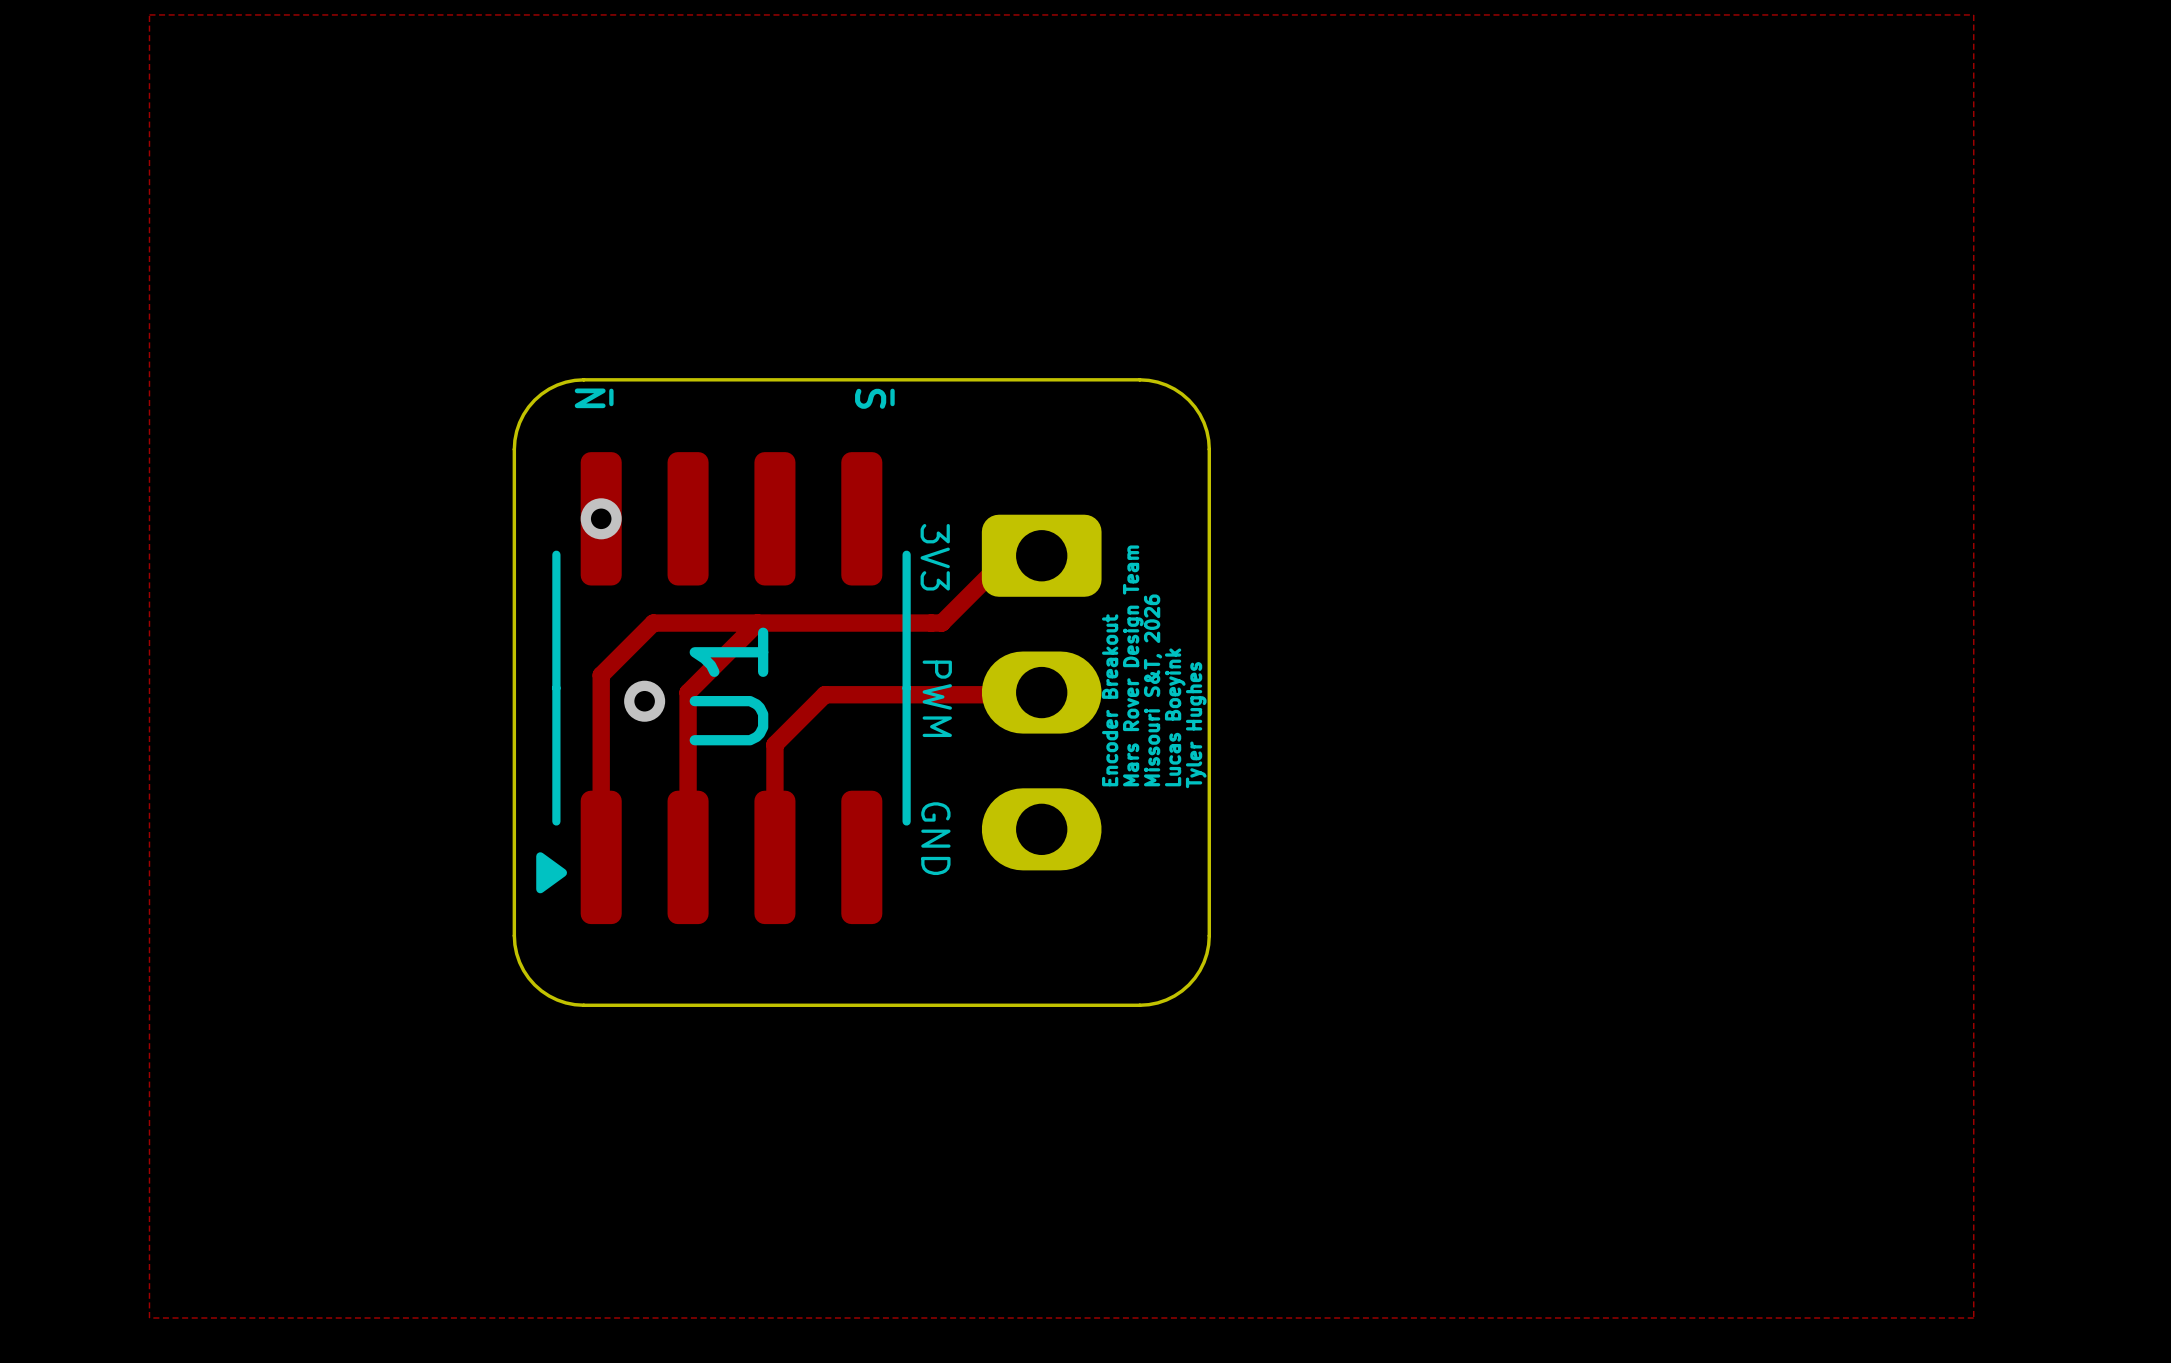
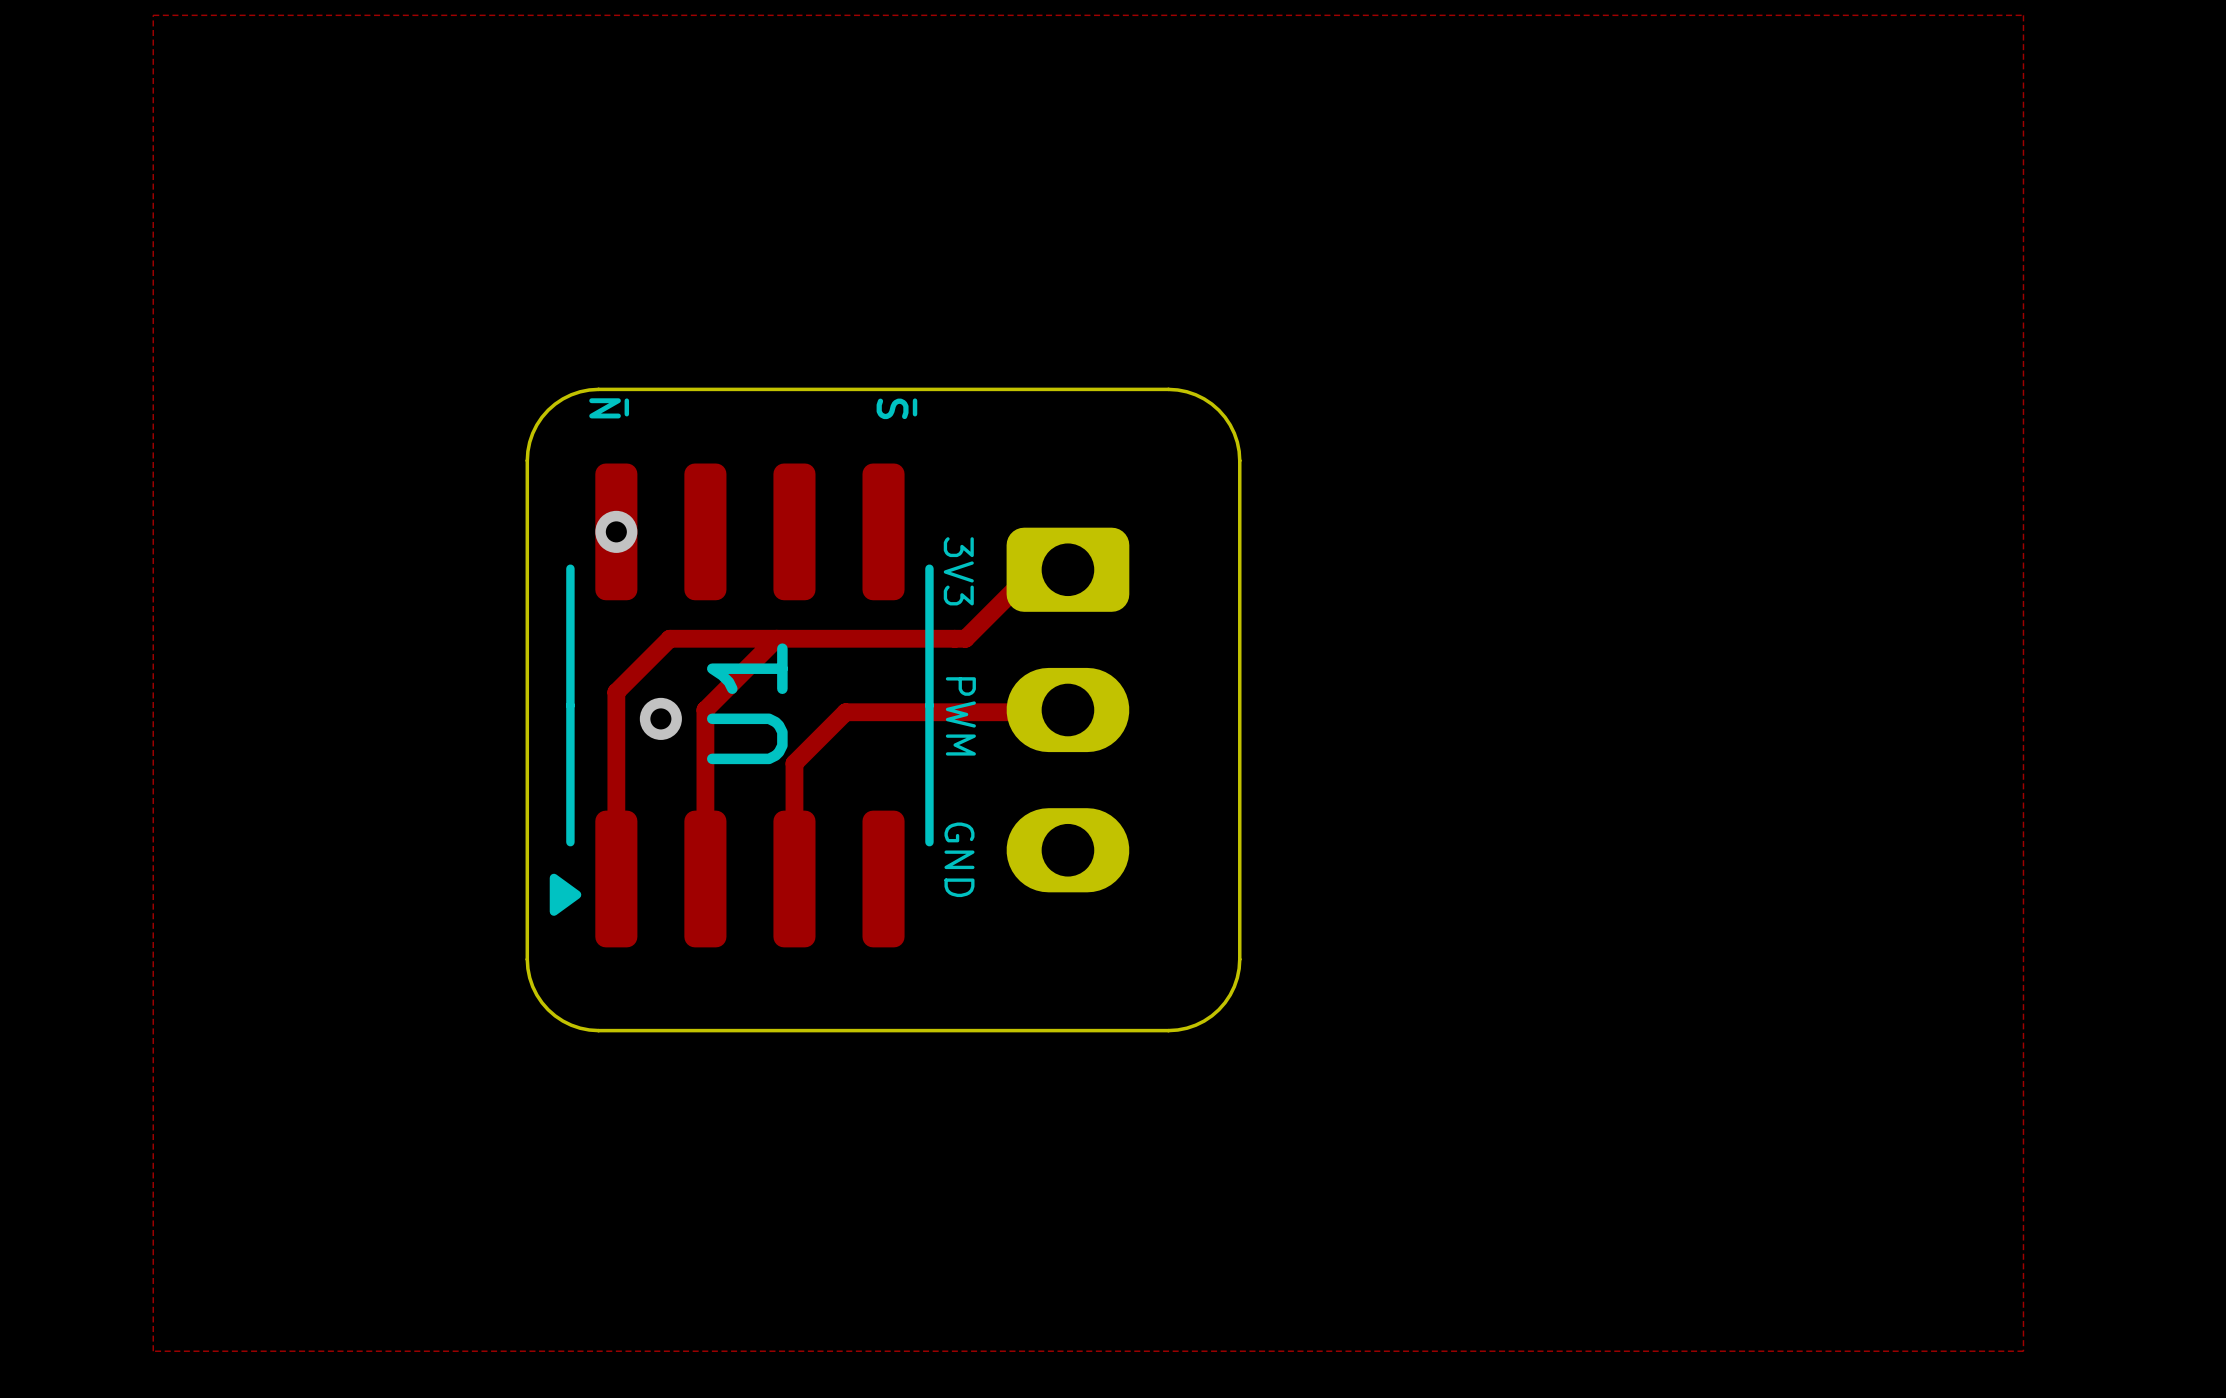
text: Mars Rover Design Team (1133, 665) -> none
text: Missouri S&T, 2026 (1153, 690) -> none
text: Encoder Breakout (1110, 700) -> none
text: Lucas Boeyink (1175, 717) -> none
text: Tyler Hughes (1196, 725) -> none

